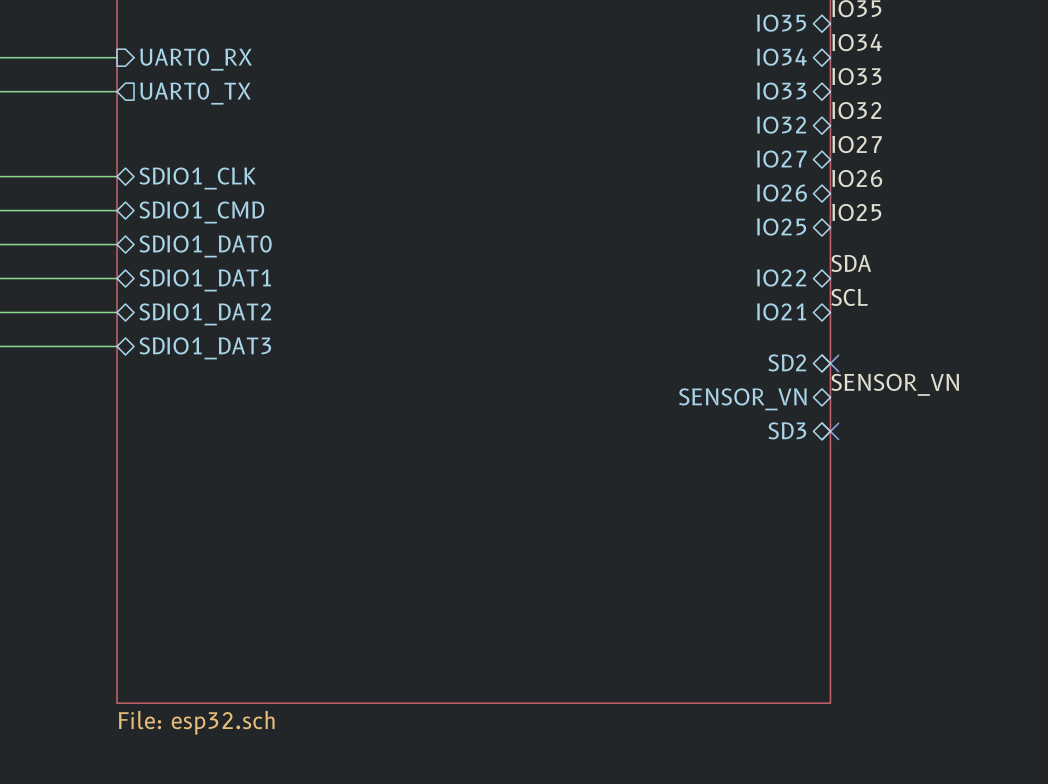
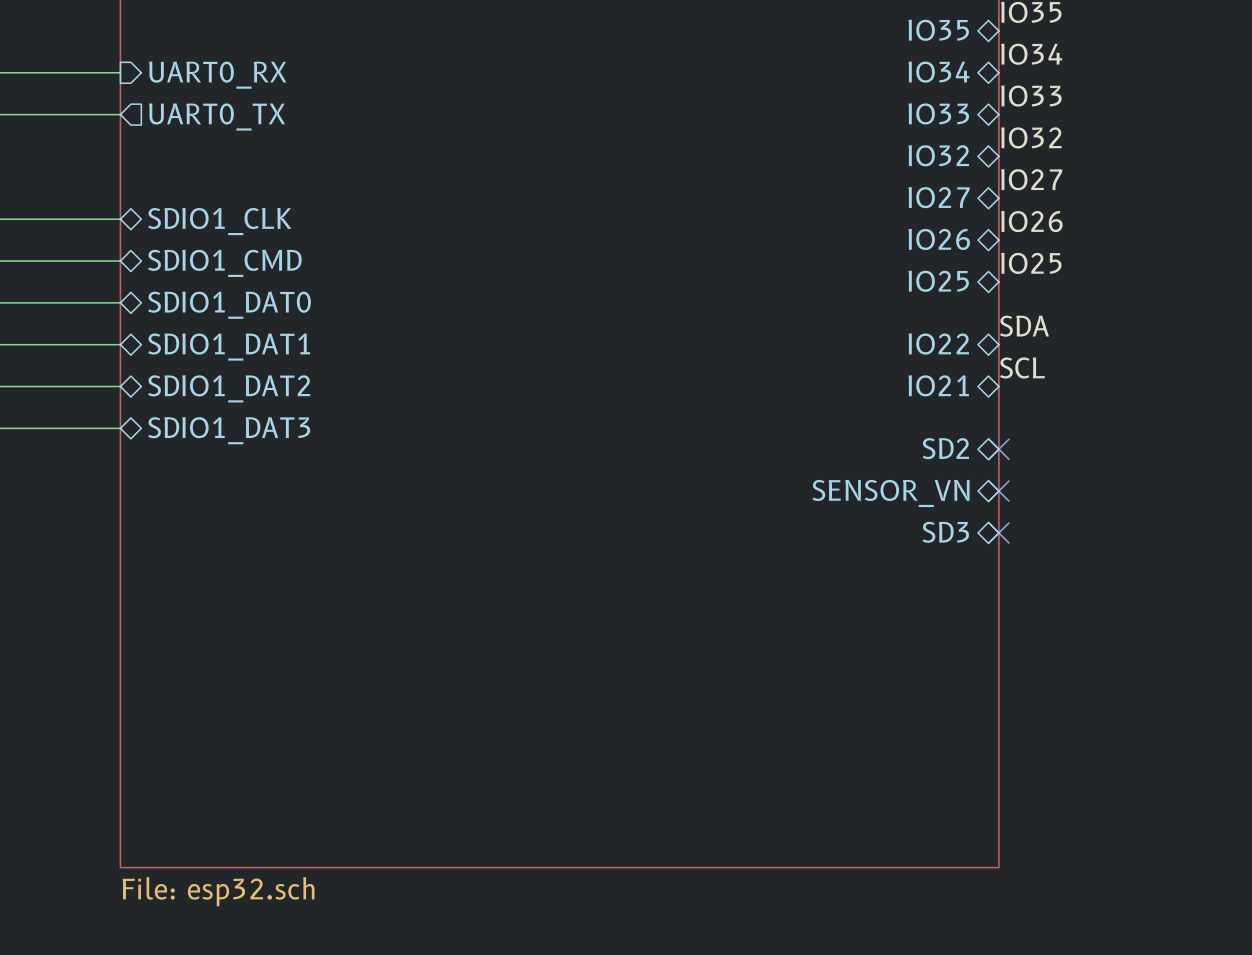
label: SENSOR_VN (895, 384) -> none
no-connect mark: none -> (998, 491)

